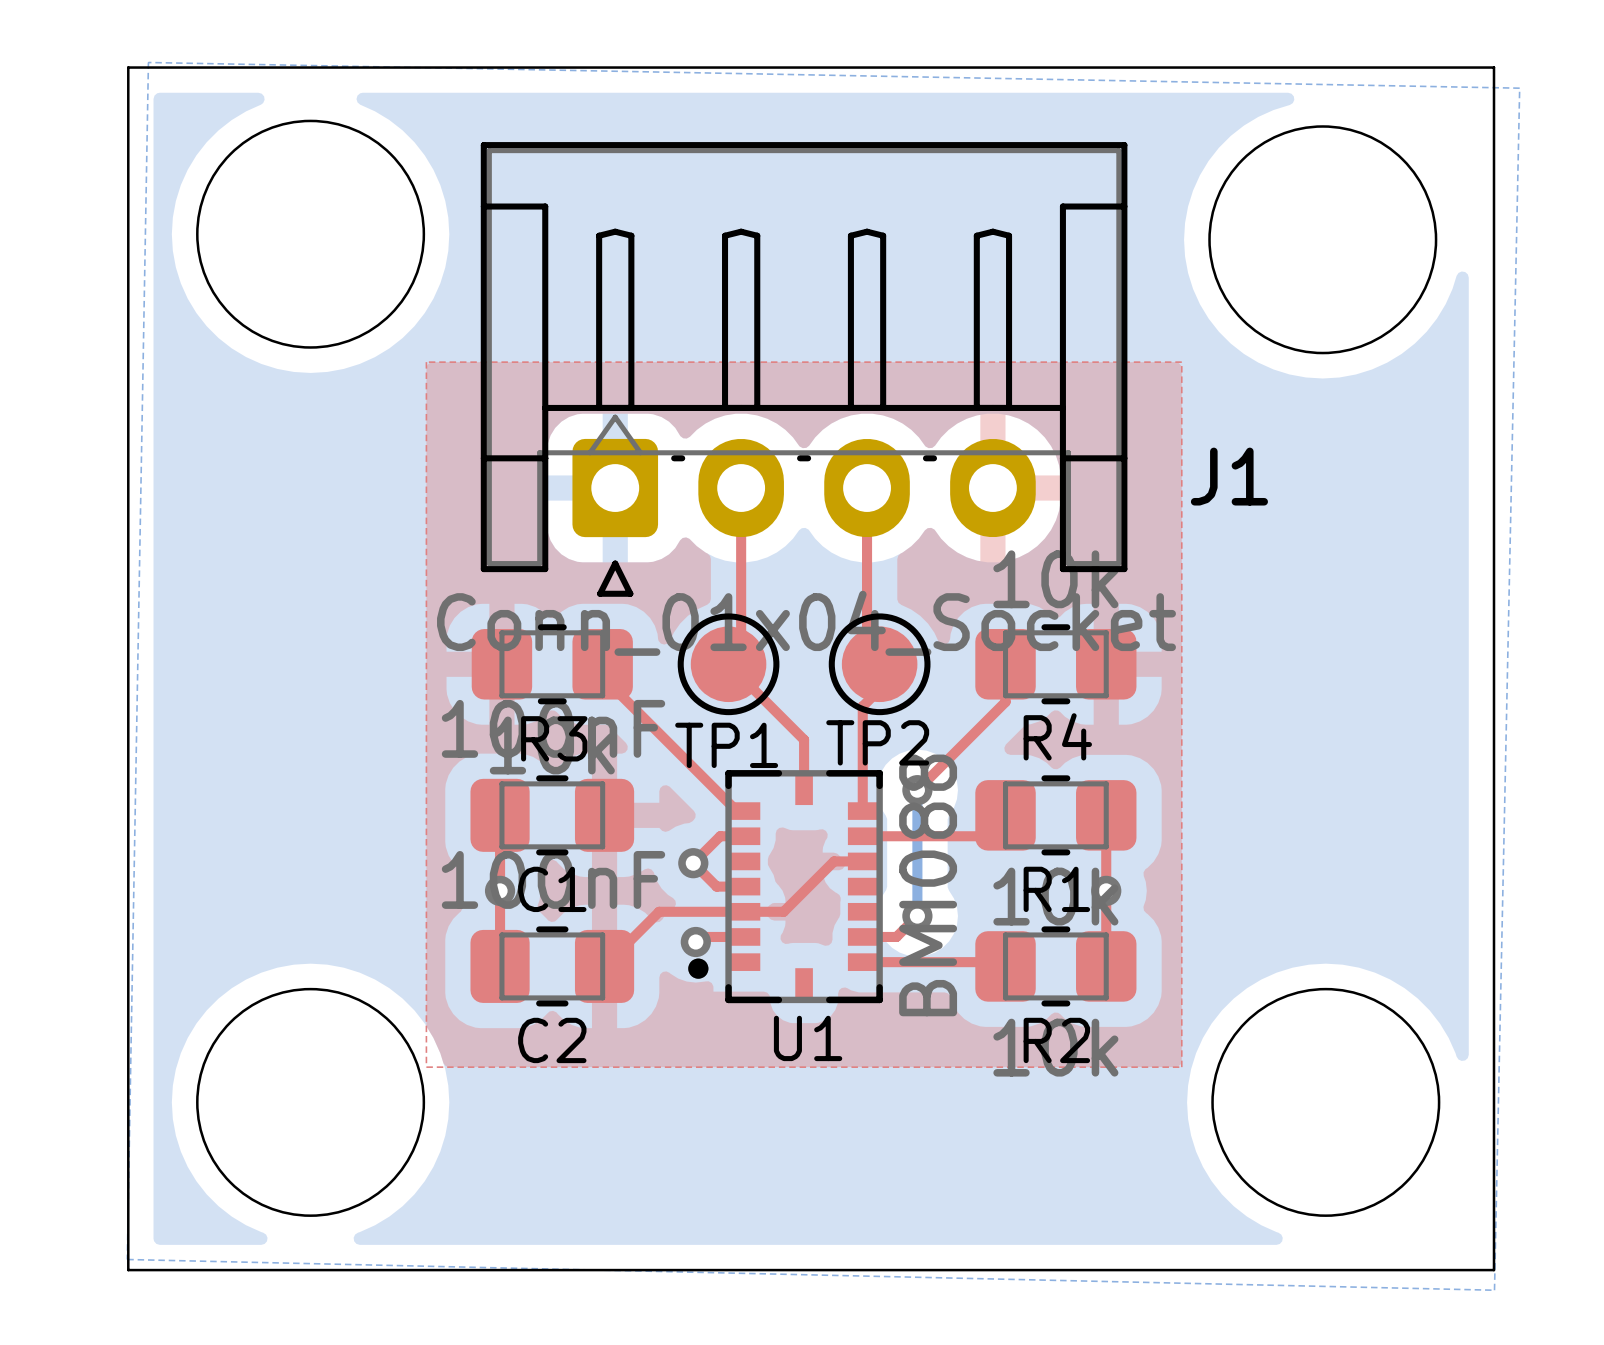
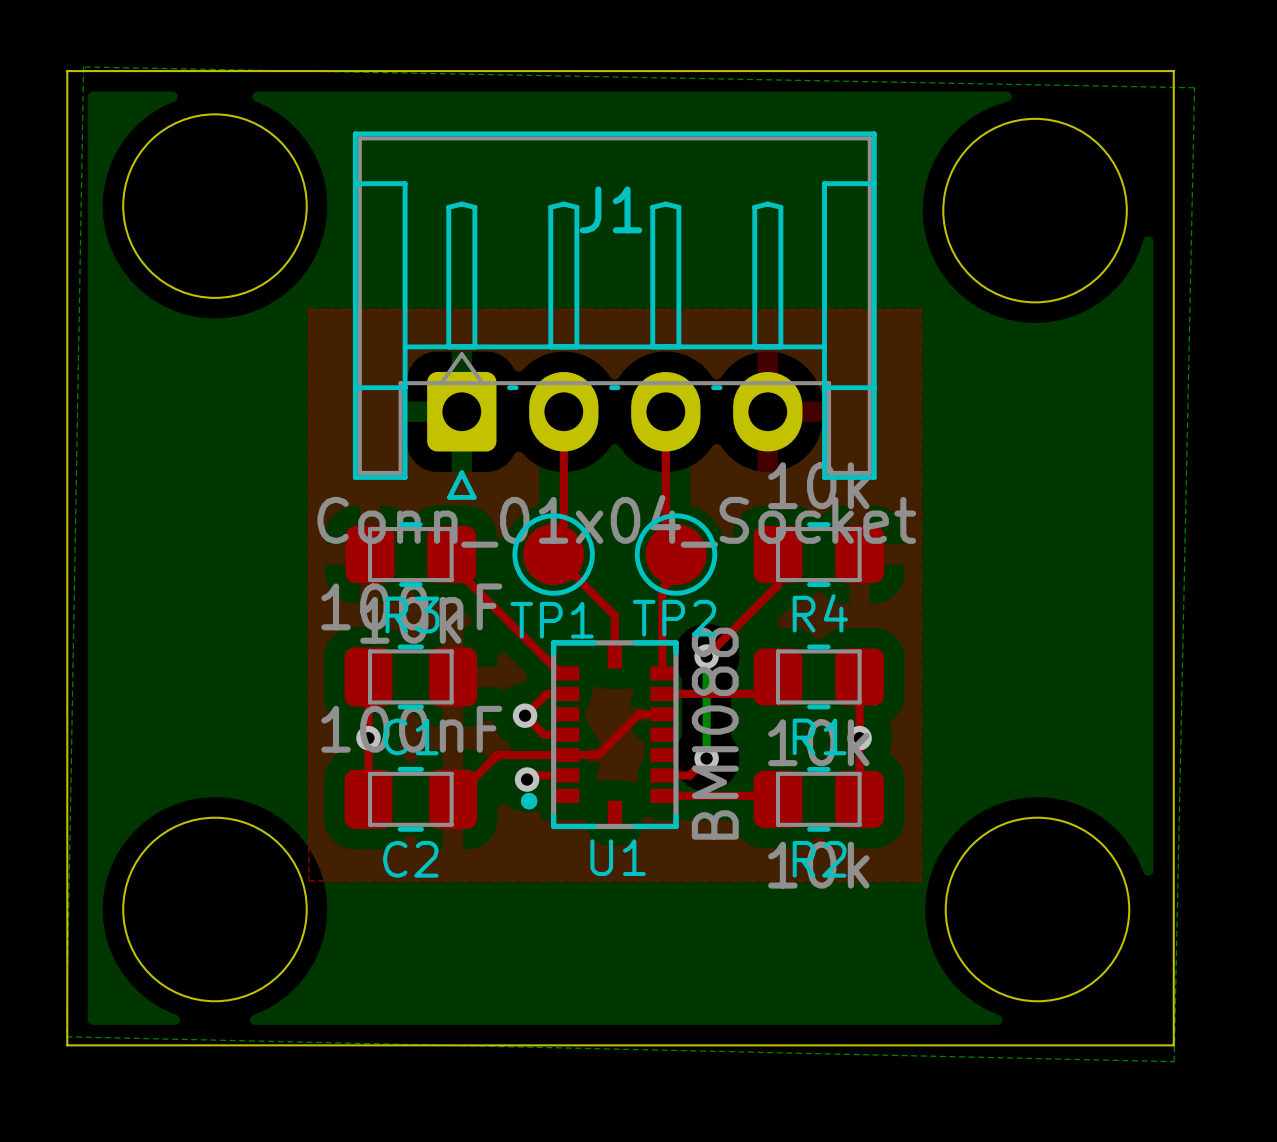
J1 name position: J1 (1229, 476) -> J1 (610, 209)

